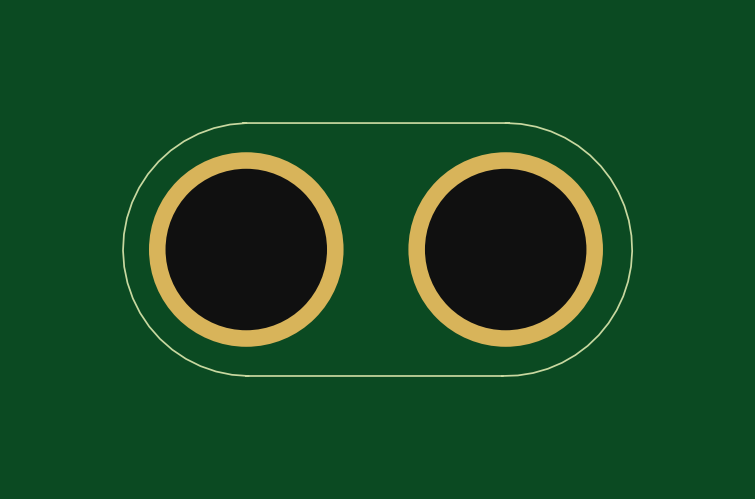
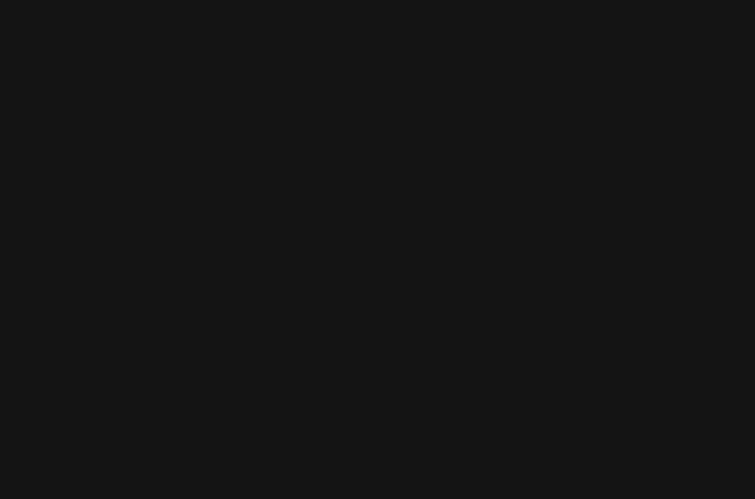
part: (377, 249) -> none

